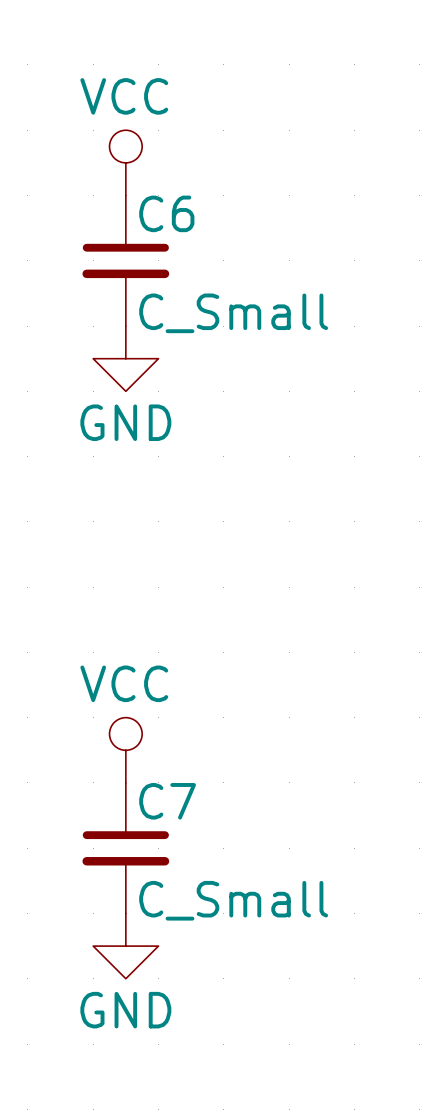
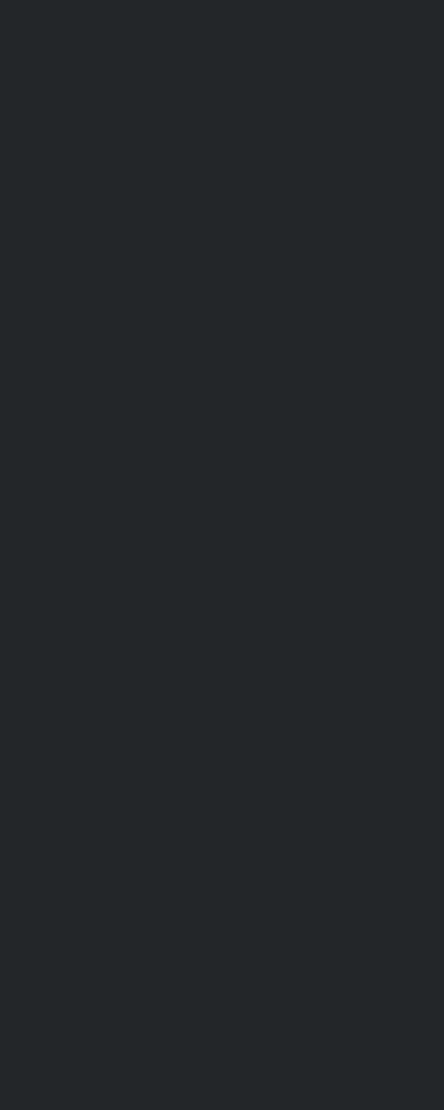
power symbol: VCC (125, 162) -> none
C6: C_Small (125, 260) -> none
power symbol: GND (125, 358) -> none
power symbol: VCC (125, 750) -> none
C7: C_Small (125, 848) -> none
power symbol: GND (125, 946) -> none

